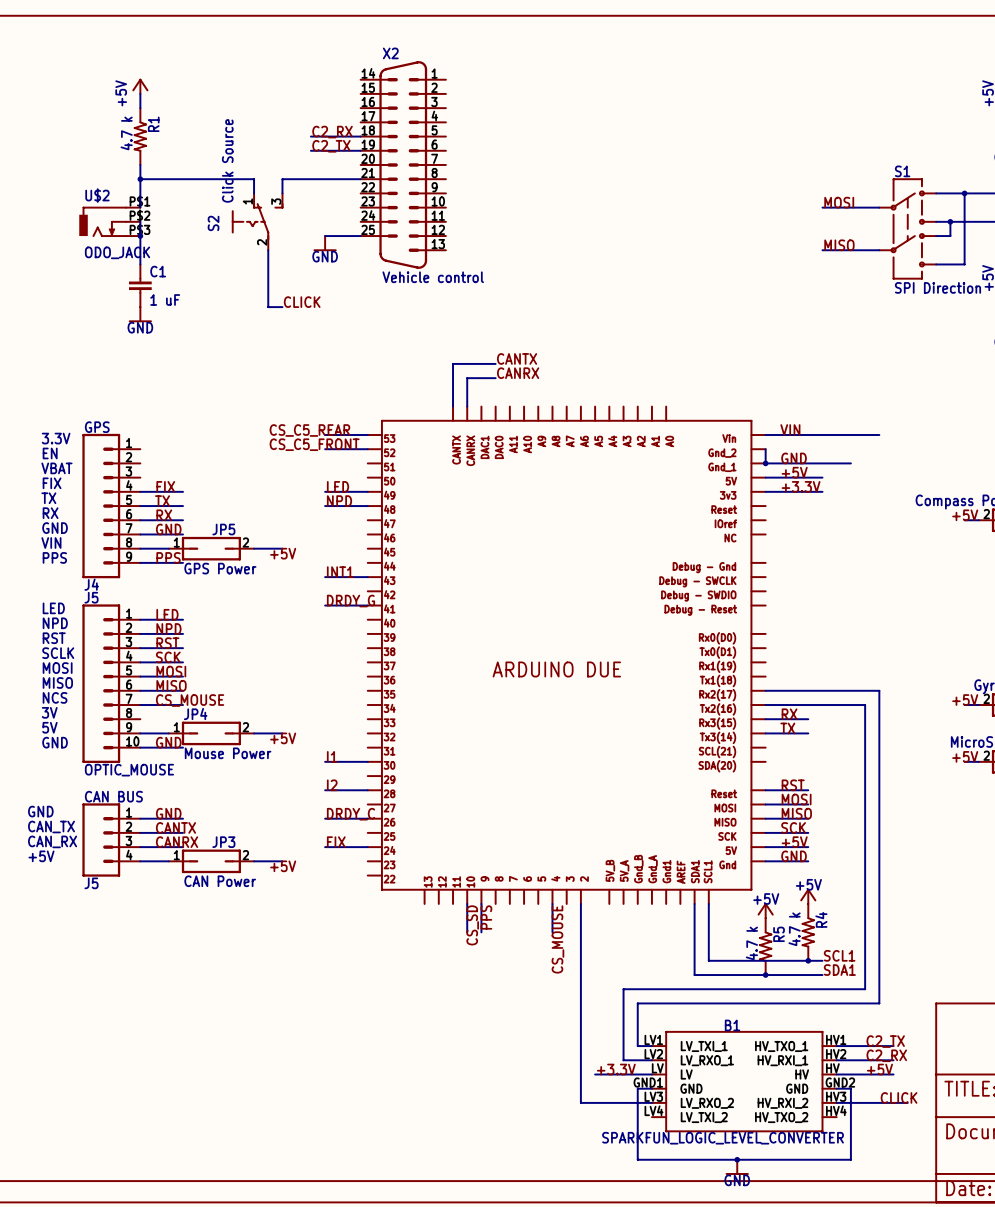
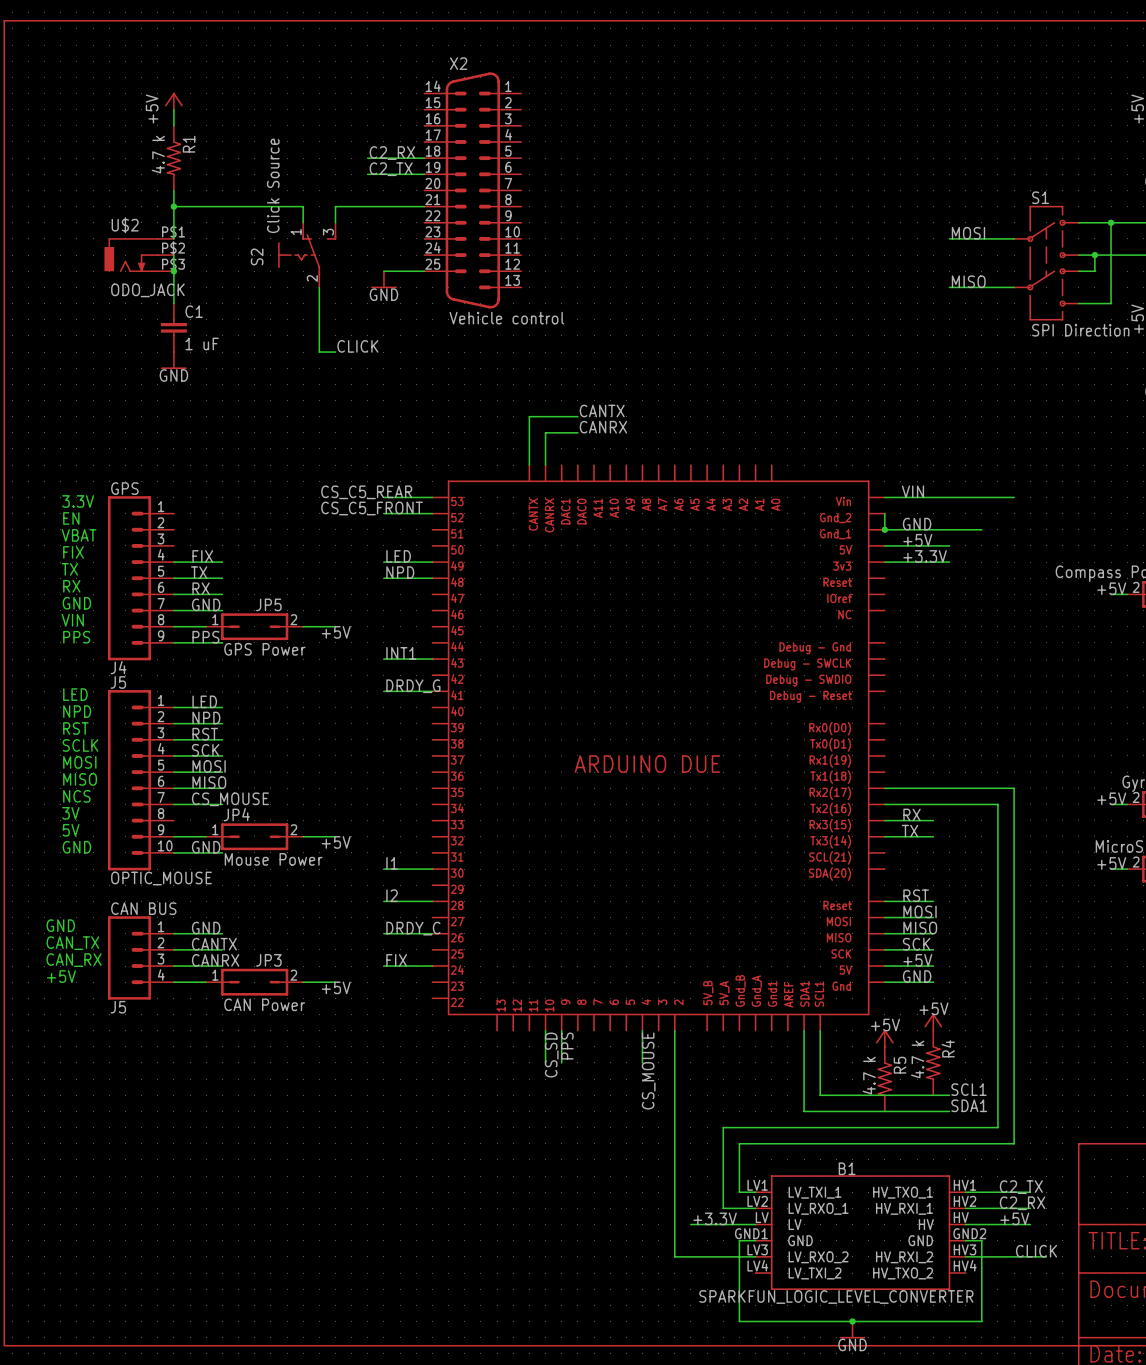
junction: (808, 960) -> none
junction: (765, 975) -> none

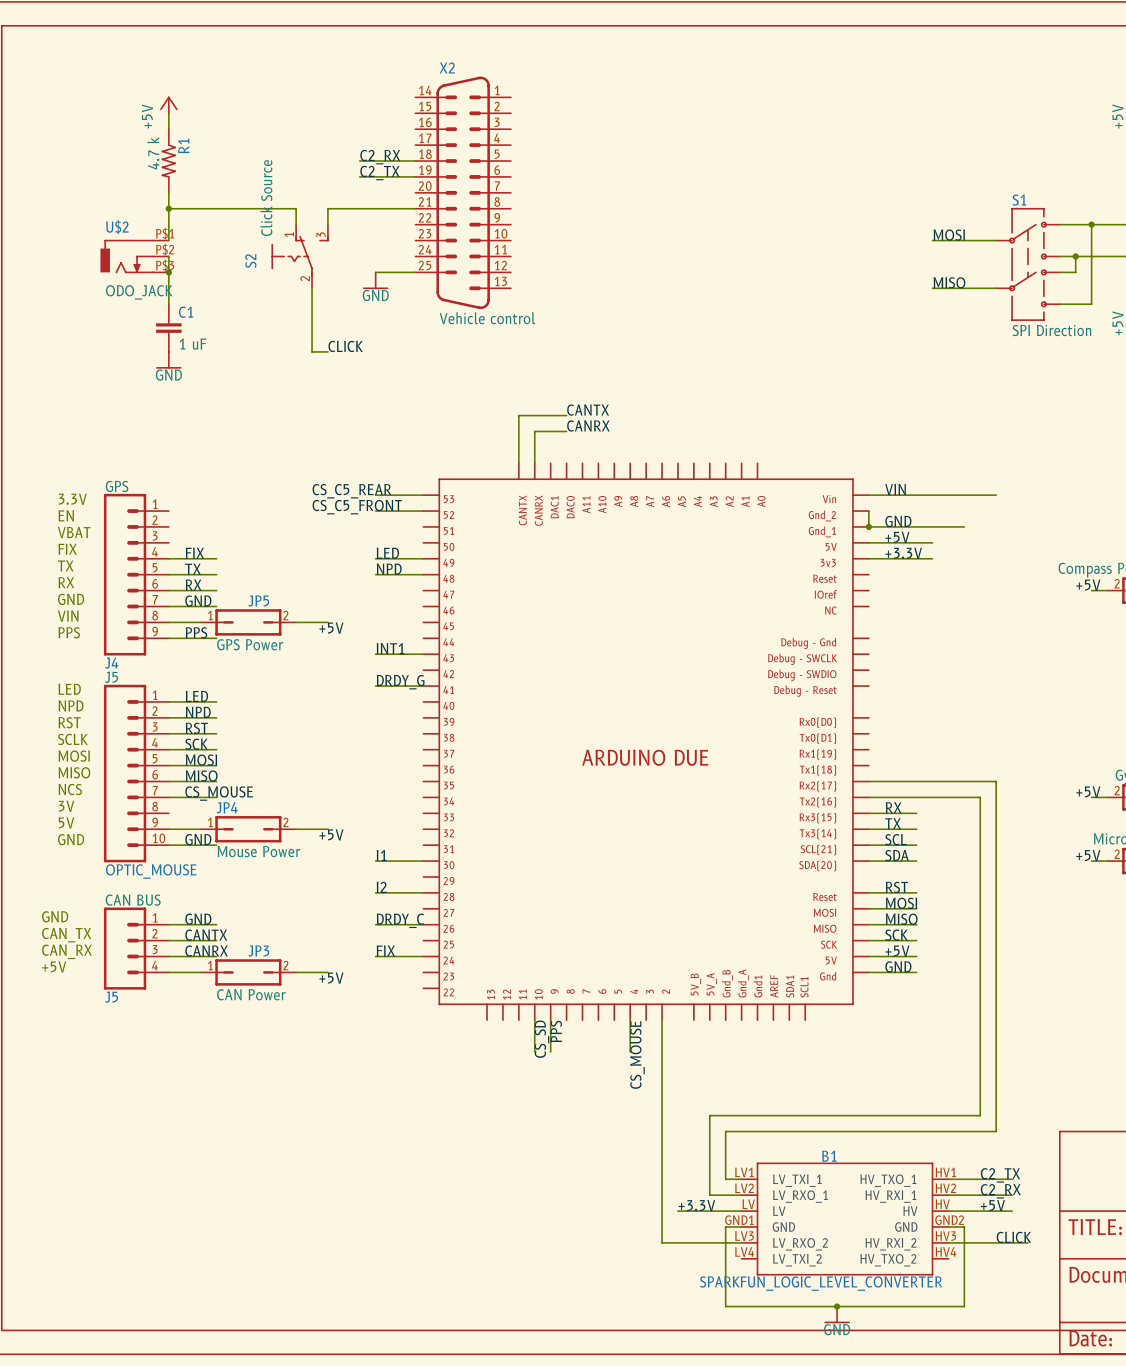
label: none -> SCL (896, 839)
wire: none -> (868, 845) (916, 845)
label: none -> SDA (897, 855)
wire: none -> (868, 861) (916, 861)
power symbol: +5V (933, 1022) -> none
wire: (804, 1030) (804, 1111) (949, 1111) -> none
wire: (820, 1030) (820, 1095) (949, 1095) -> none
power symbol: +5V (884, 1038) -> none
R4: 4.7 k (933, 1062) -> none
R5: 4.7 k (884, 1079) -> none
label: SCL1 (968, 1089) -> none
label: SDA1 (969, 1105) -> none

